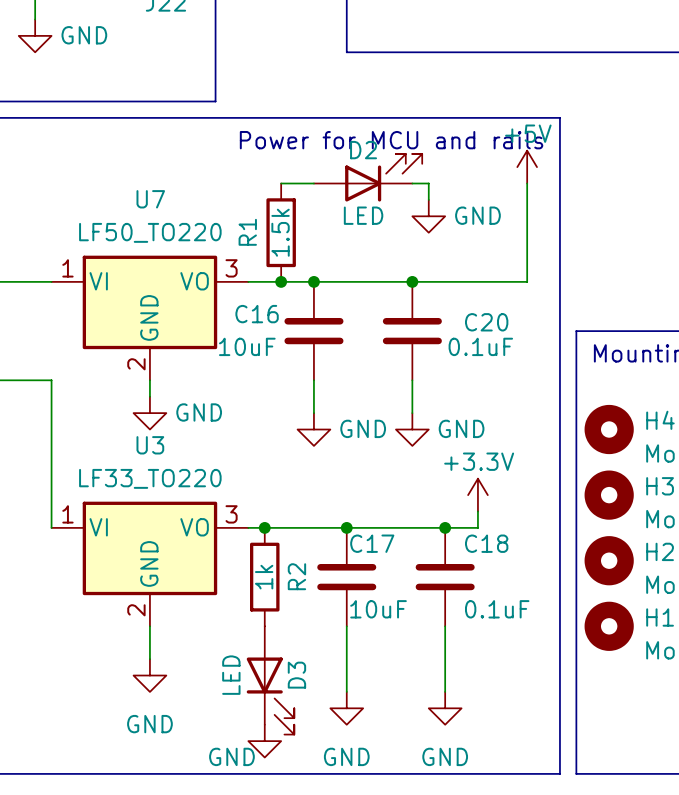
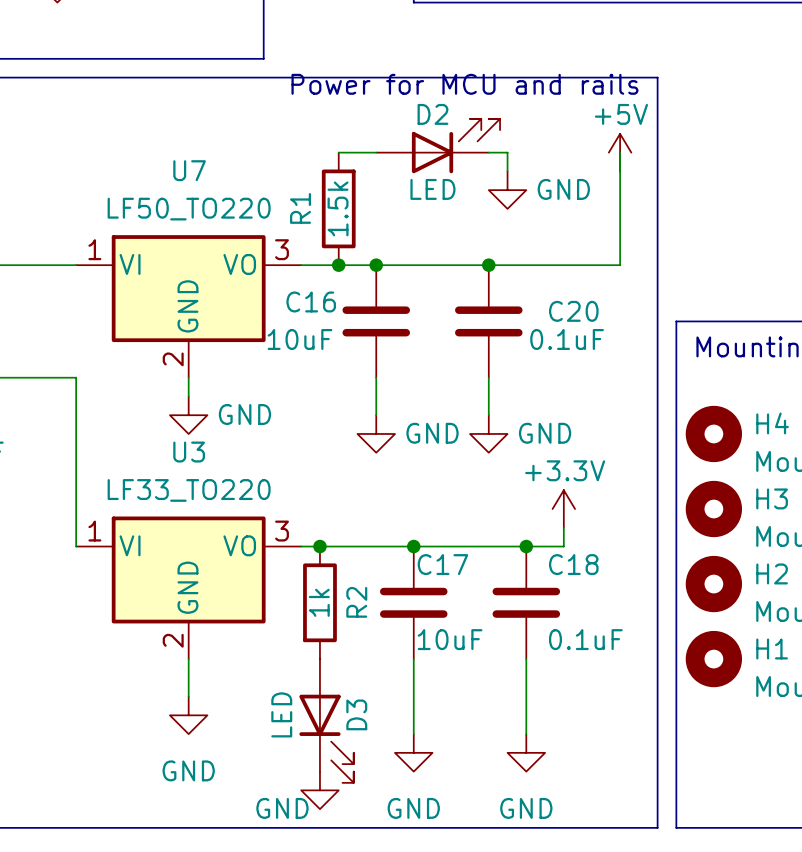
text position: Power for MCU and rails (391, 140) -> Power for MCU and rails (464, 84)
power symbol position: +5V (527, 167) -> +5V (620, 152)

